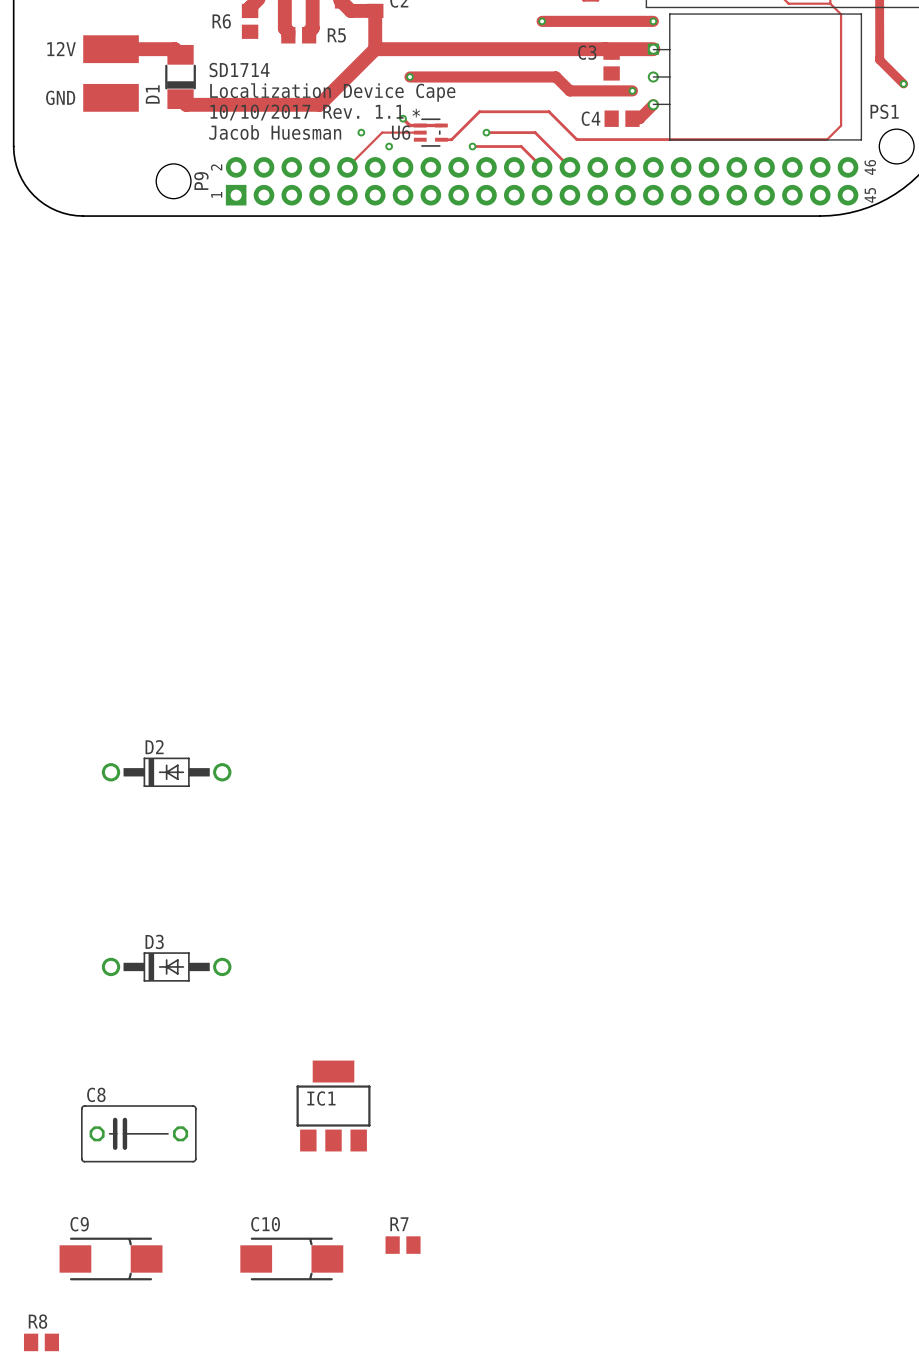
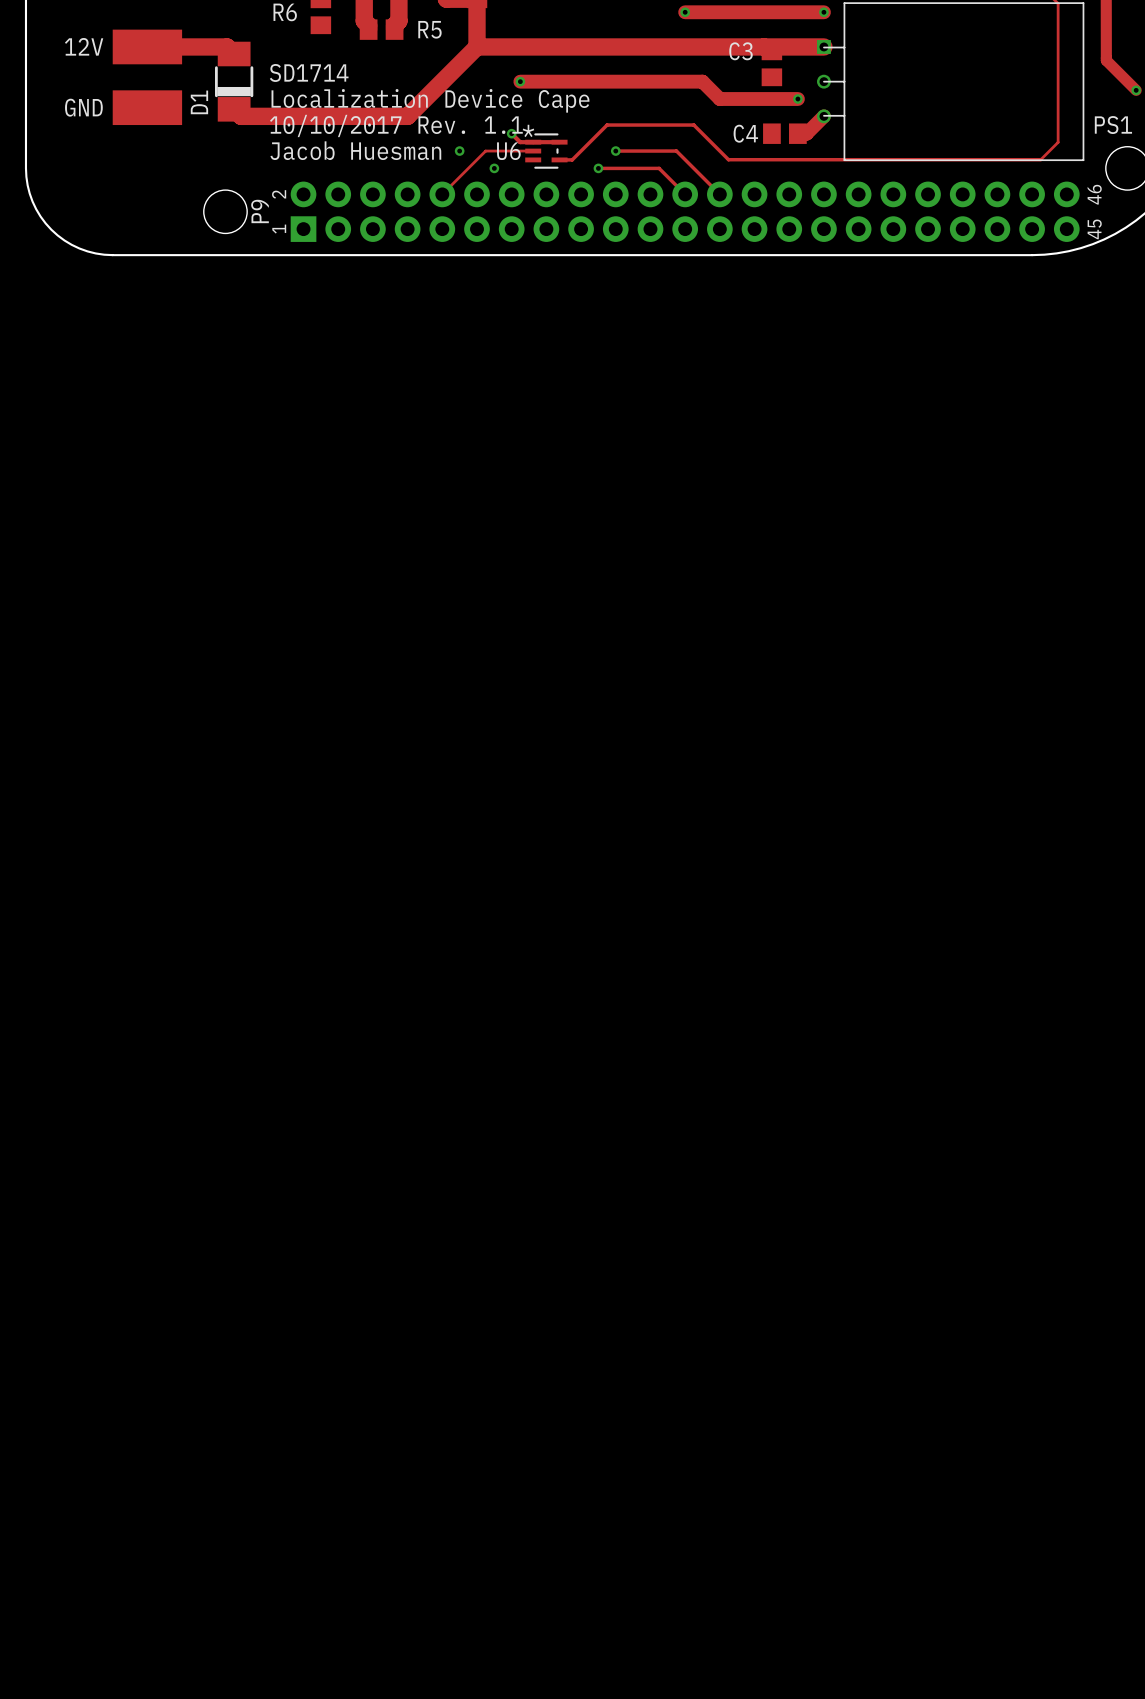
D2: (166, 772) -> none
D3: (166, 966) -> none
IC1: (333, 1106) -> none
C8: (138, 1133) -> none
R7: (403, 1245) -> none
C9: (111, 1258) -> none
C10: (291, 1258) -> none
R8: (41, 1342) -> none

